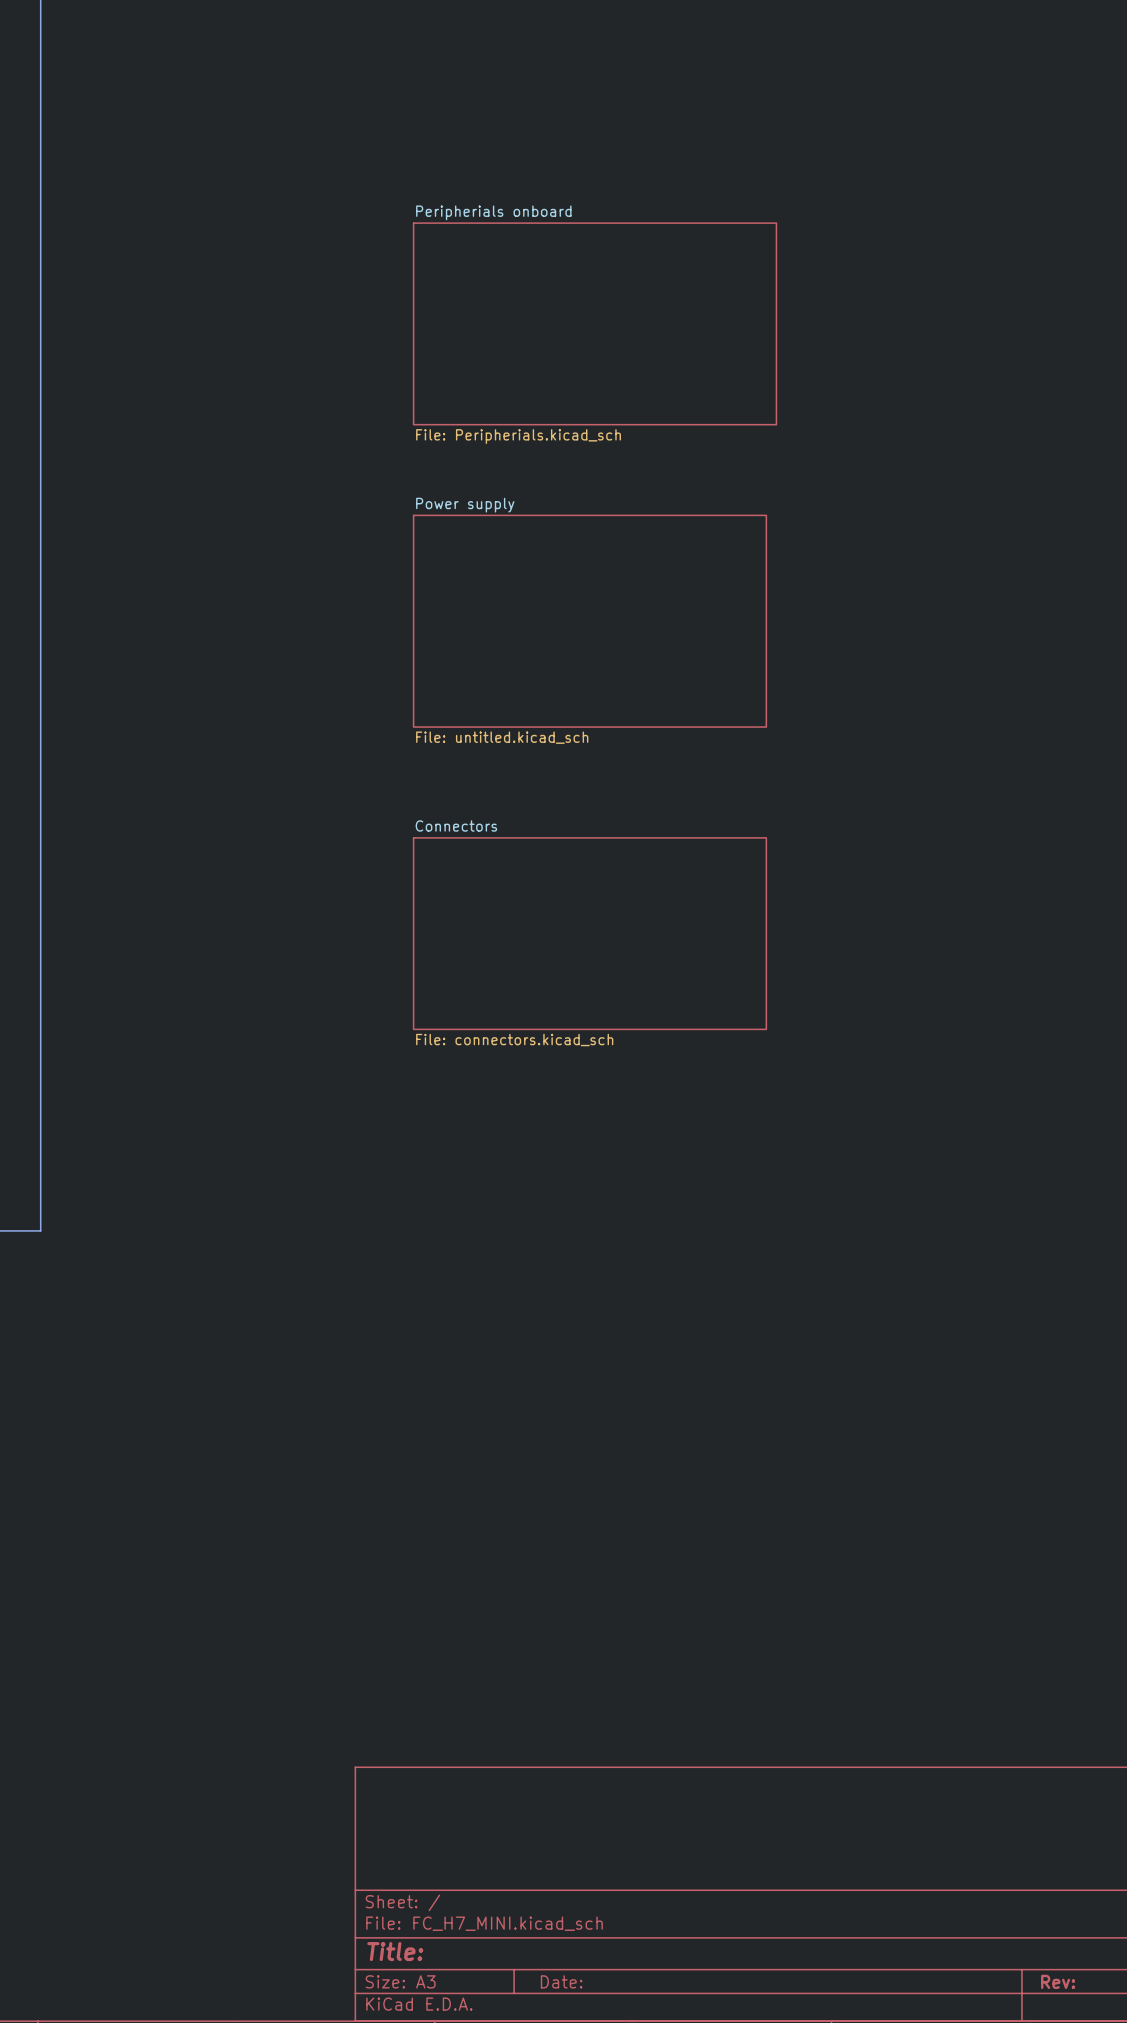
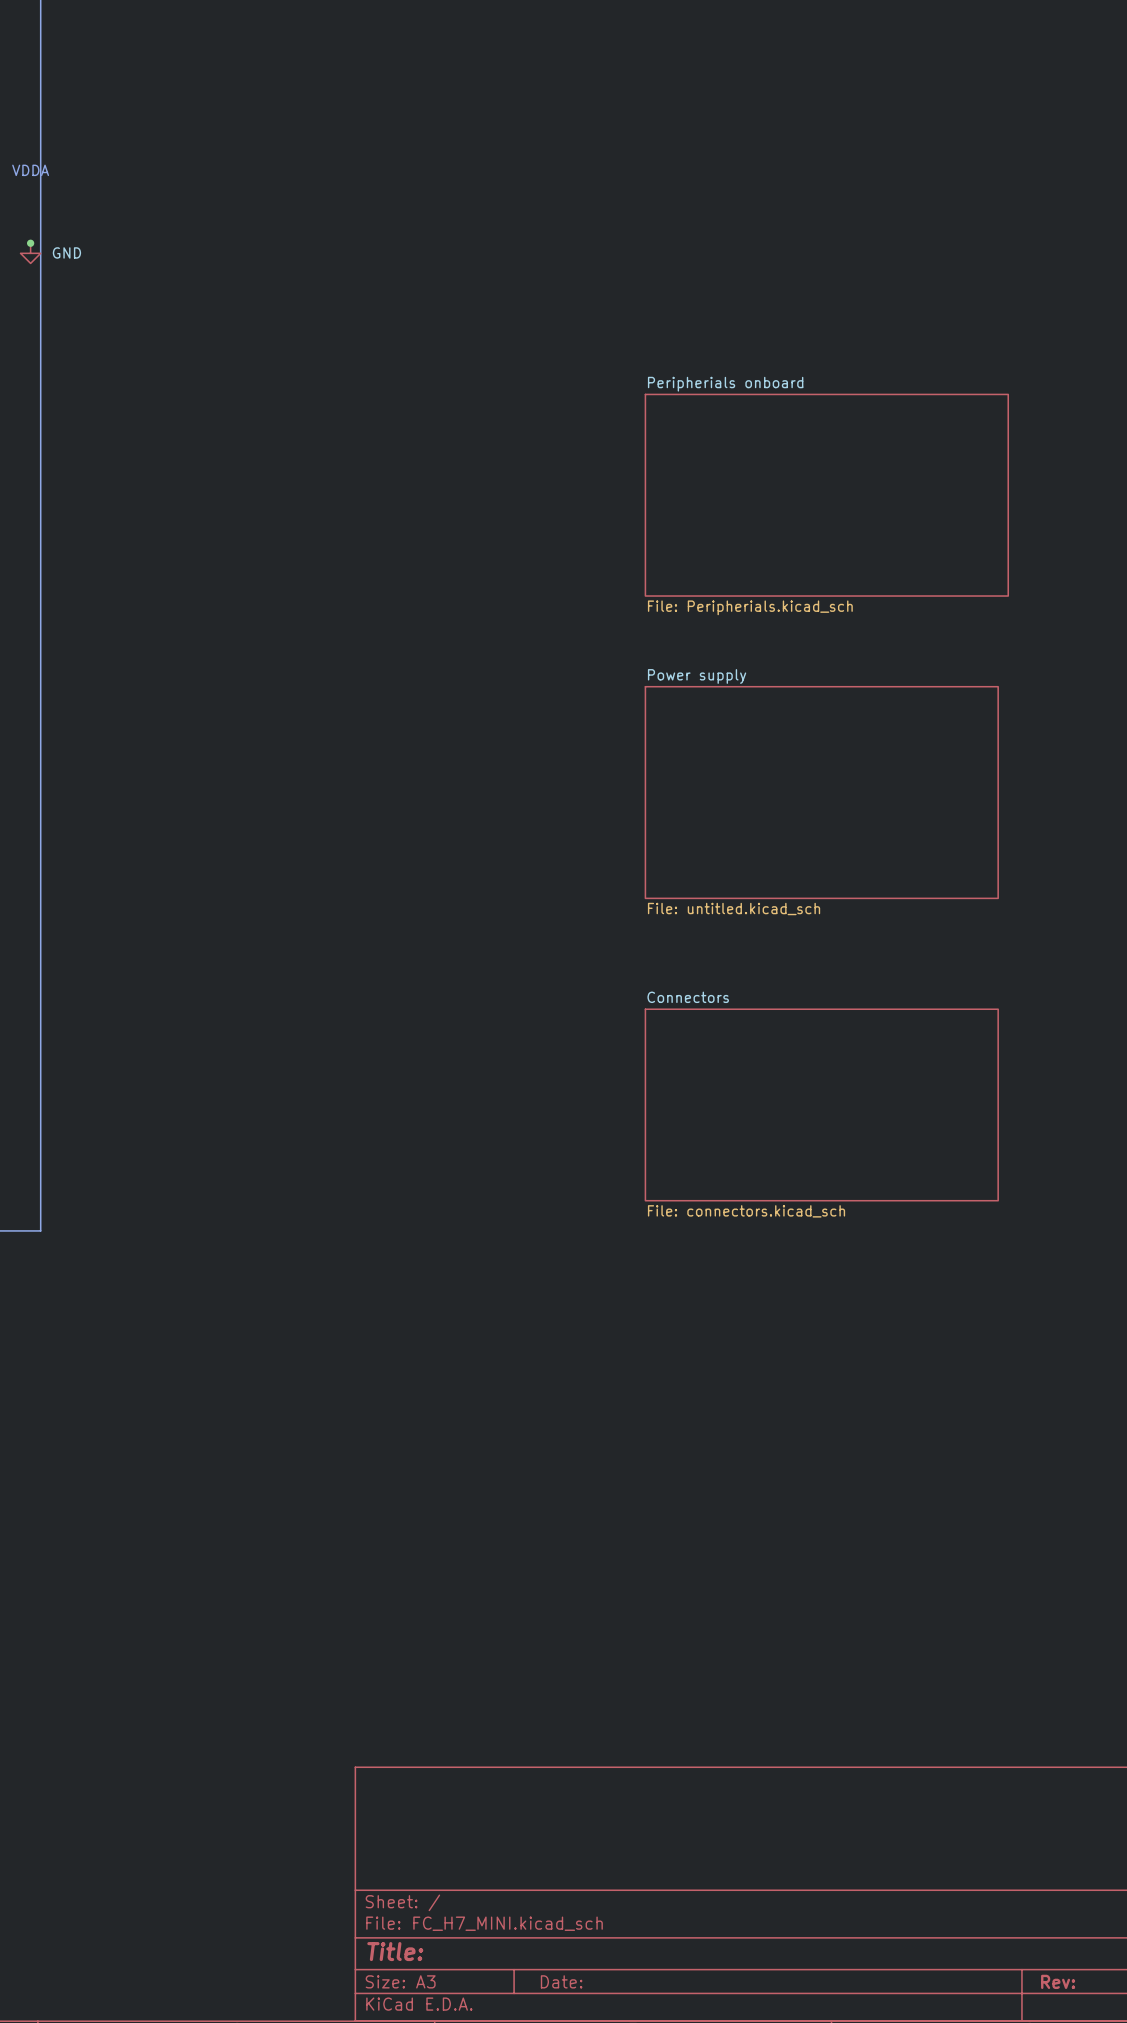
text: none -> VDDA (30, 170)
junction: none -> (30, 243)
power symbol: none -> GND (30, 253)
sheet Peripherials onboard: File: Peripherials.kicad_sch (595, 323) -> none
sheet Peripherials onboard: none -> File: Peripherials.kicad_sch (826, 495)
sheet Power supply: File: untitled.kicad_sch (589, 621) -> none
sheet Power supply: none -> File: untitled.kicad_sch (821, 792)
sheet Connectors: File: connectors.kicad_sch (589, 933) -> none
sheet Connectors: none -> File: connectors.kicad_sch (821, 1104)

